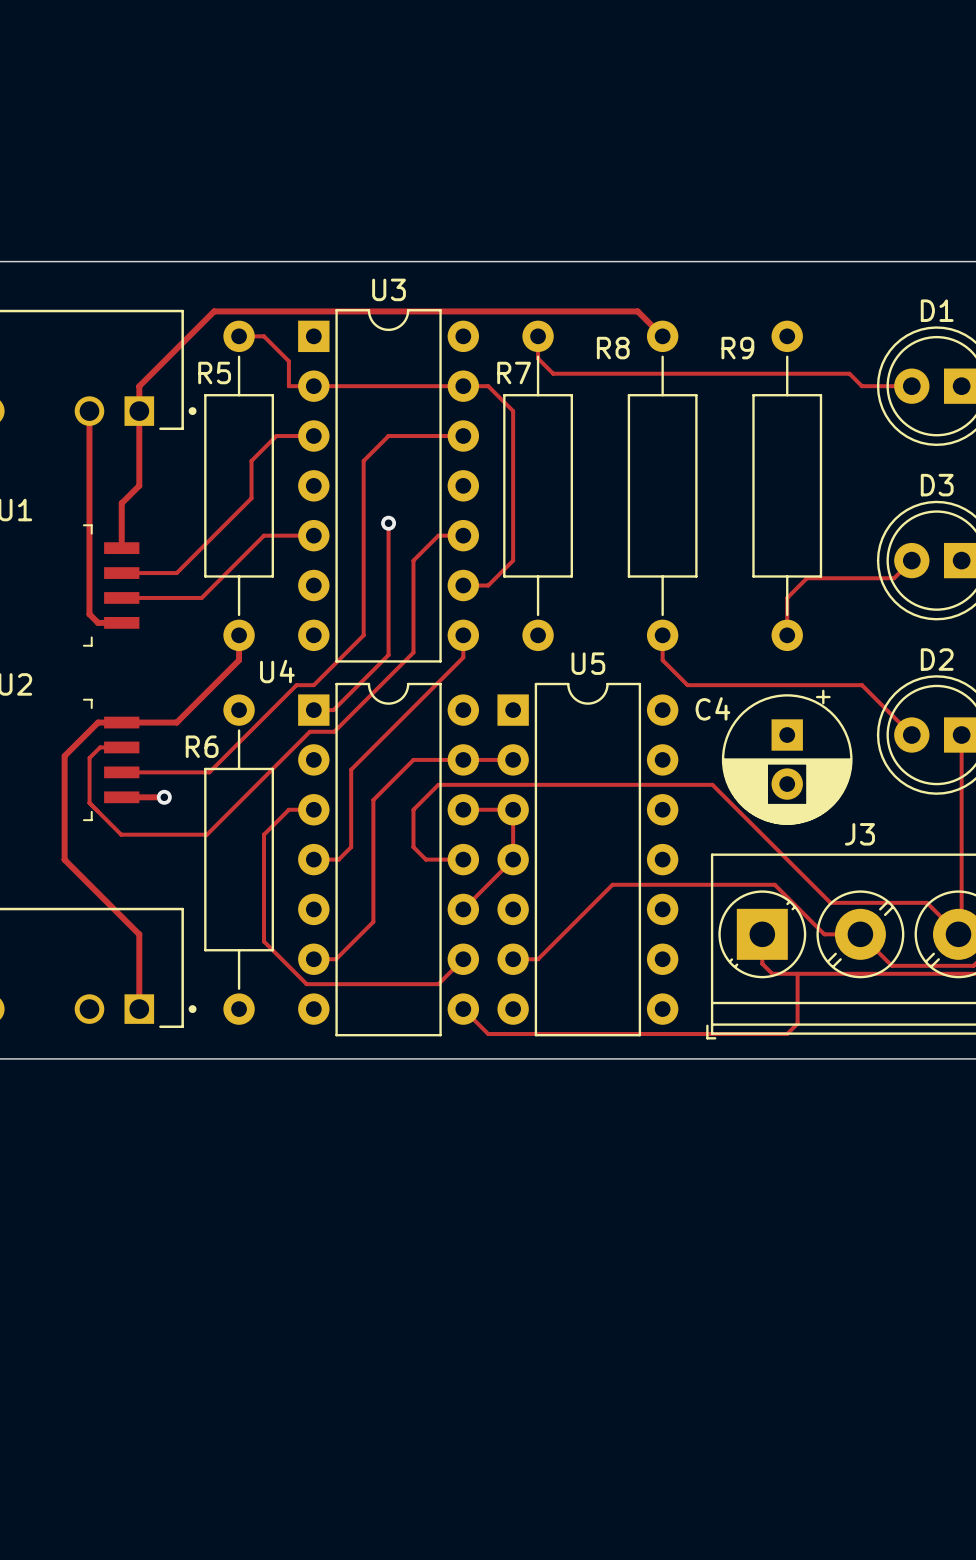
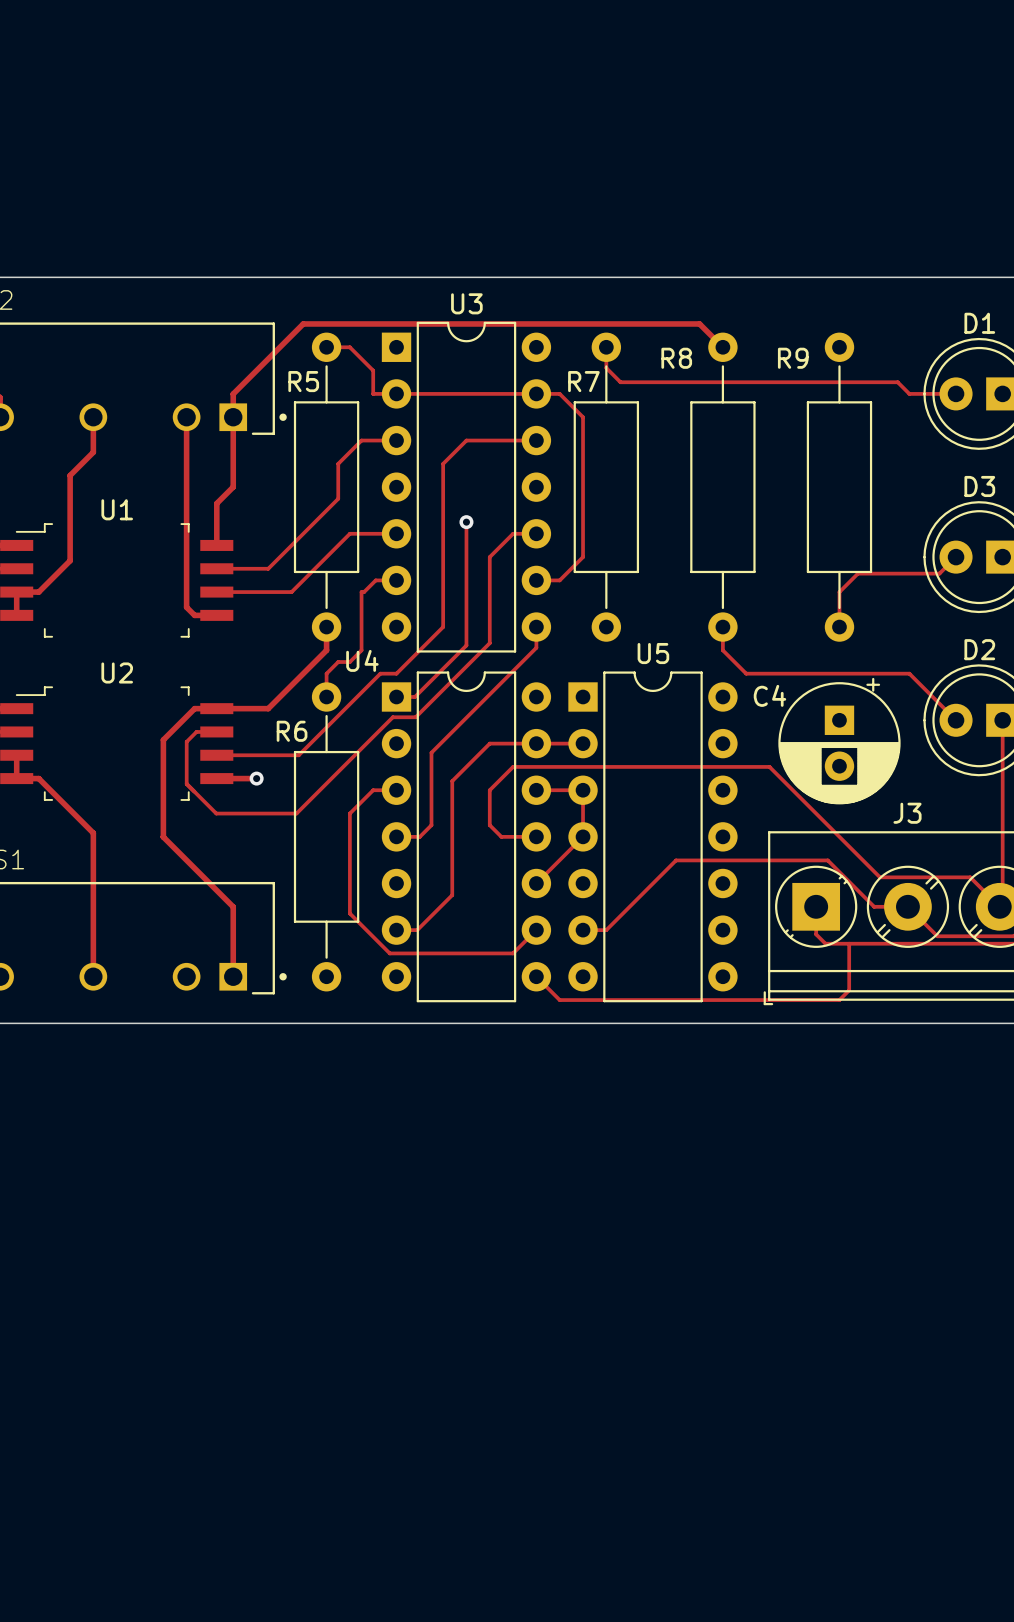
track: none -> (396, 580) (375, 580) (364, 592) (361, 592) (361, 650) (349, 662) (338, 662) (326, 673) (326, 696)

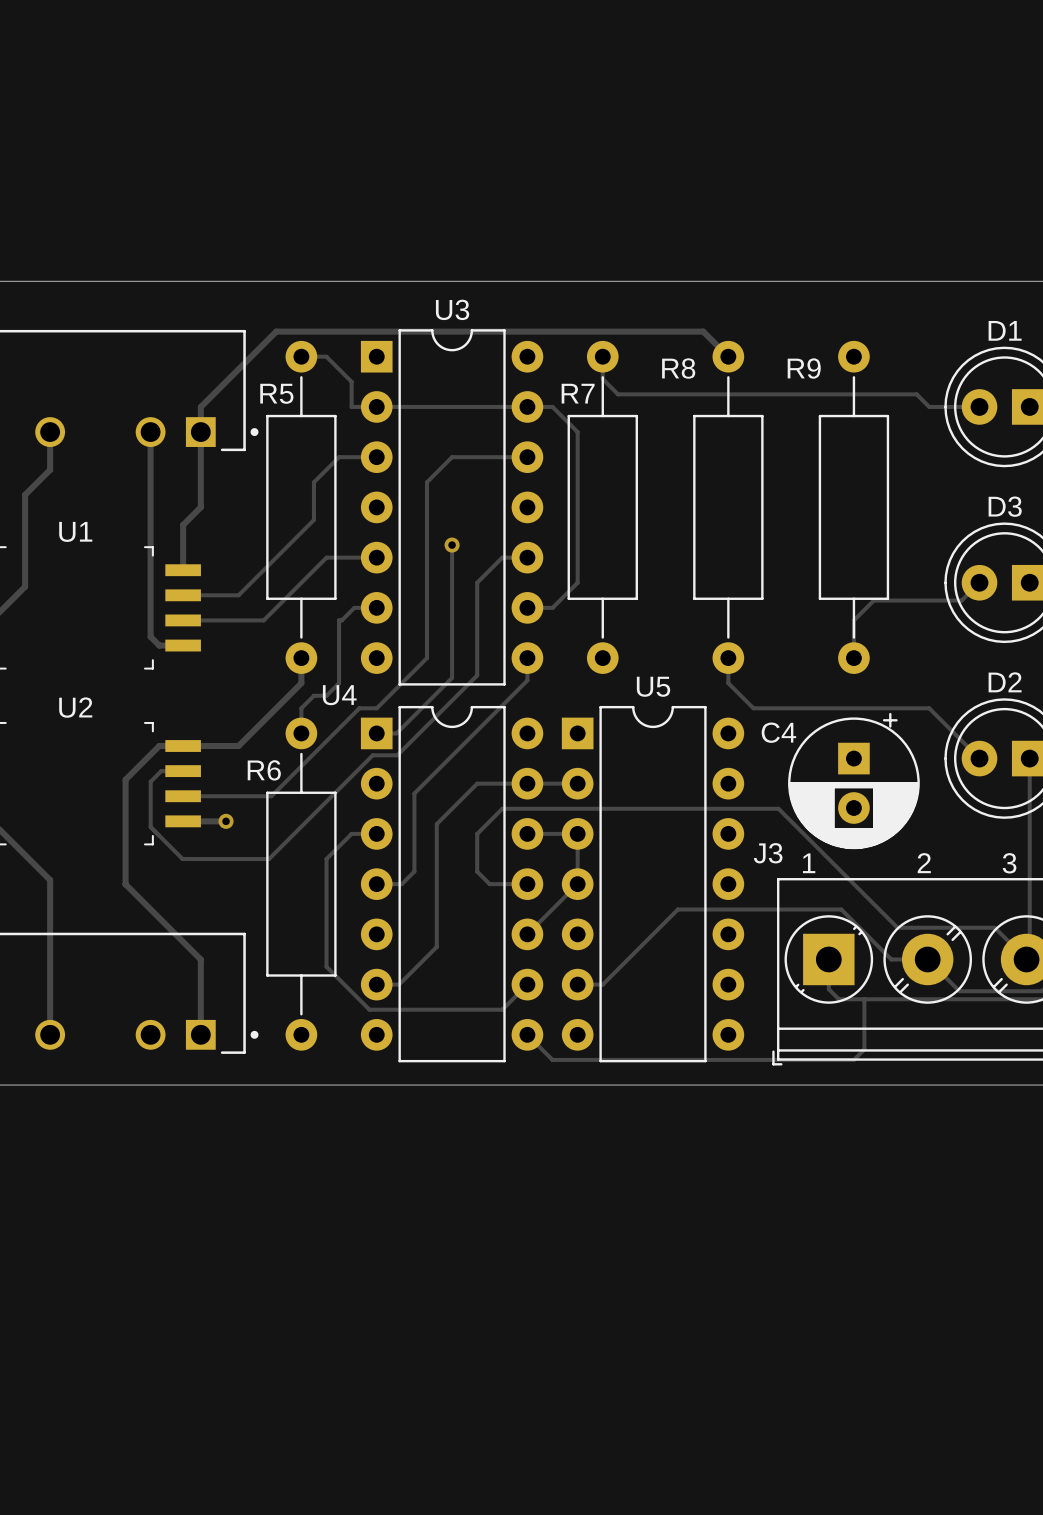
J3 name position: J3 (907, 813) -> J3 (768, 853)
text: none -> 1 (809, 863)
text: none -> 2 (924, 863)
text: none -> 3 (1009, 863)

